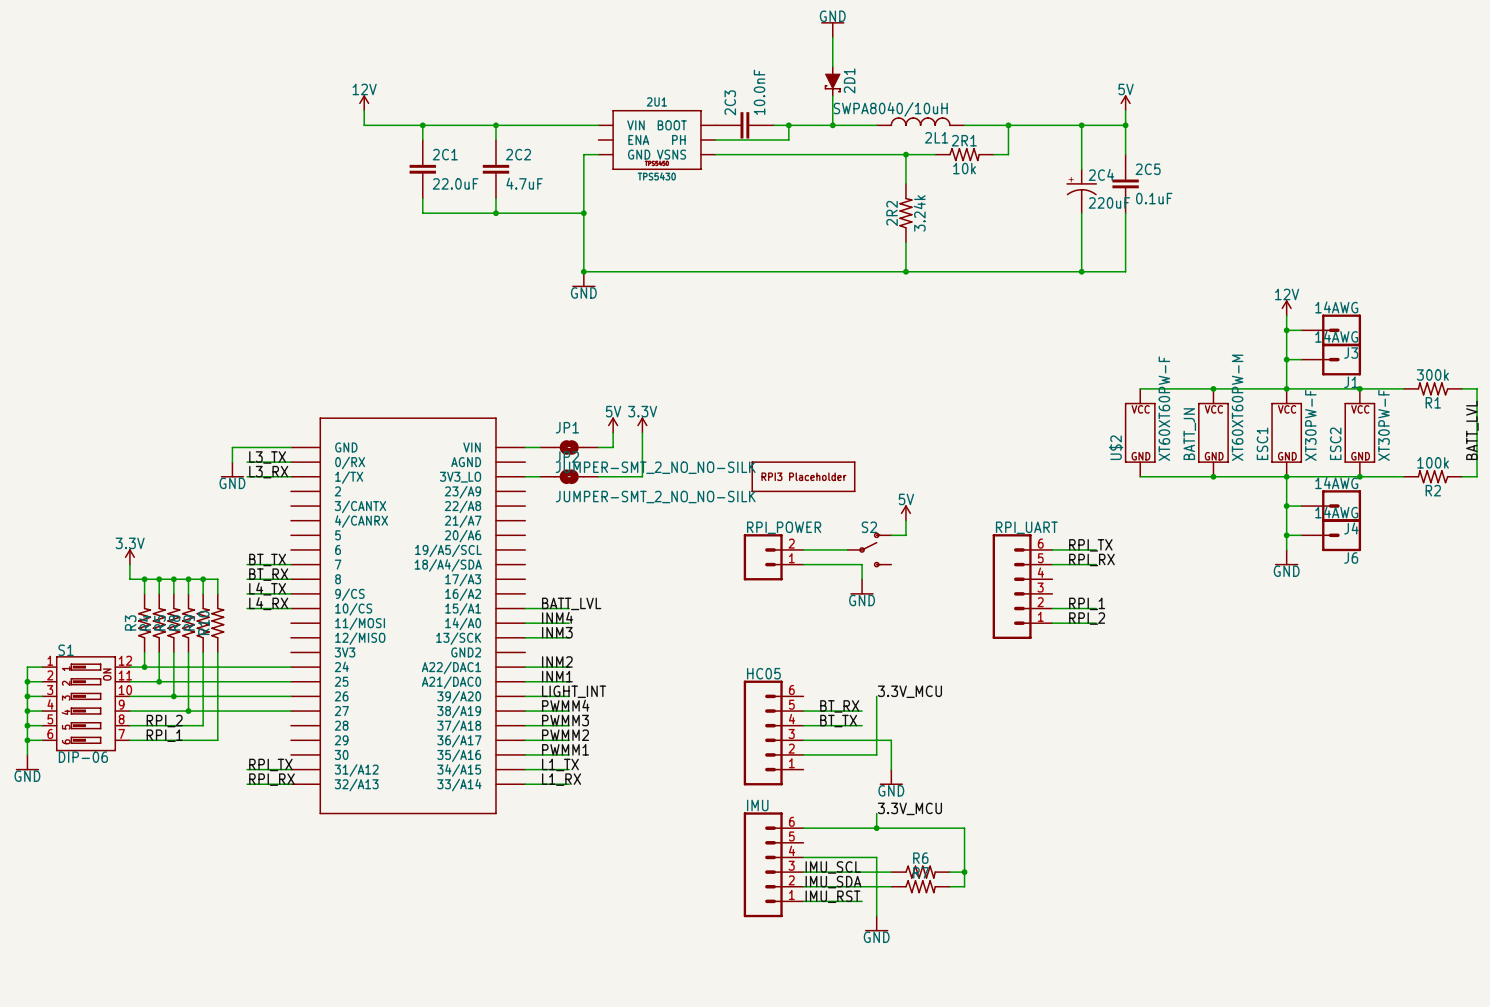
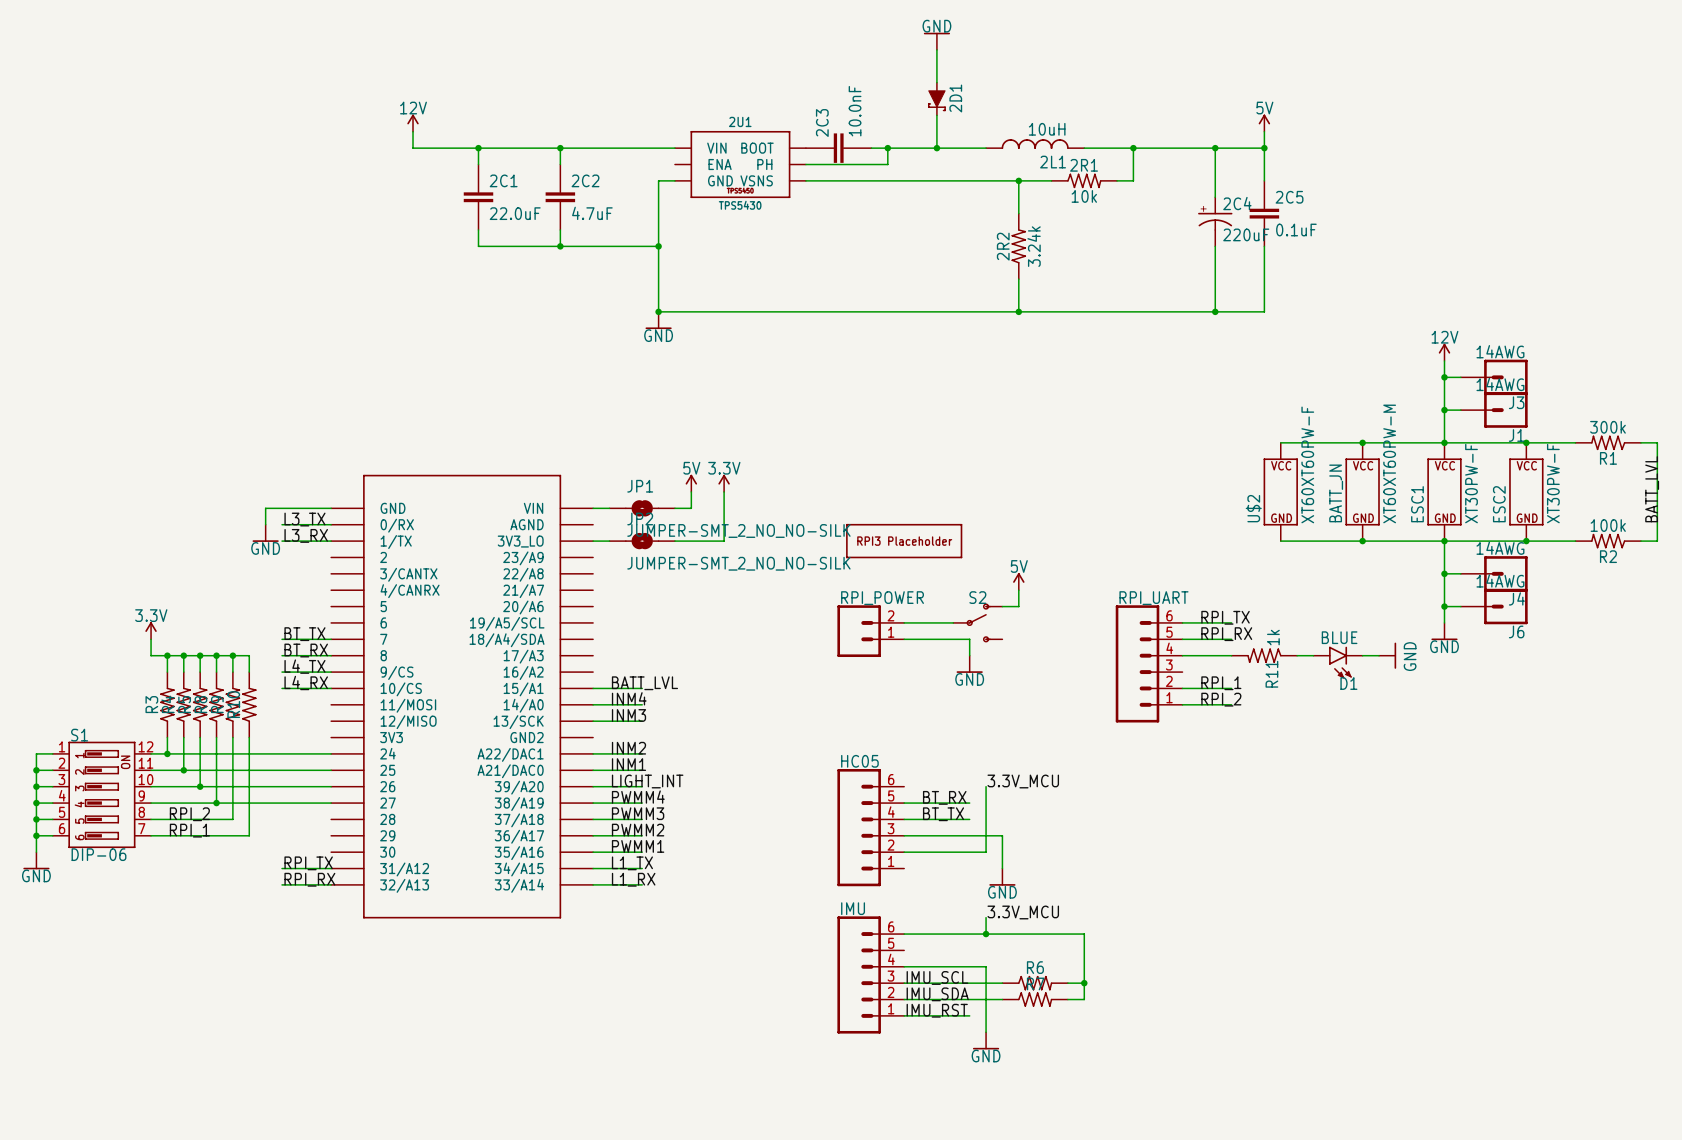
2L1 value: SWPA8040/10uH (890, 109) -> 10uH (1047, 129)
wire: none -> (1182, 655) (1231, 655)
R11: none -> 1k (1264, 655)
wire: none -> (1297, 655) (1313, 655)
wire: none -> (1362, 655) (1379, 655)
power symbol: none -> GND (1387, 655)
D1: none -> BLUE (1338, 662)

